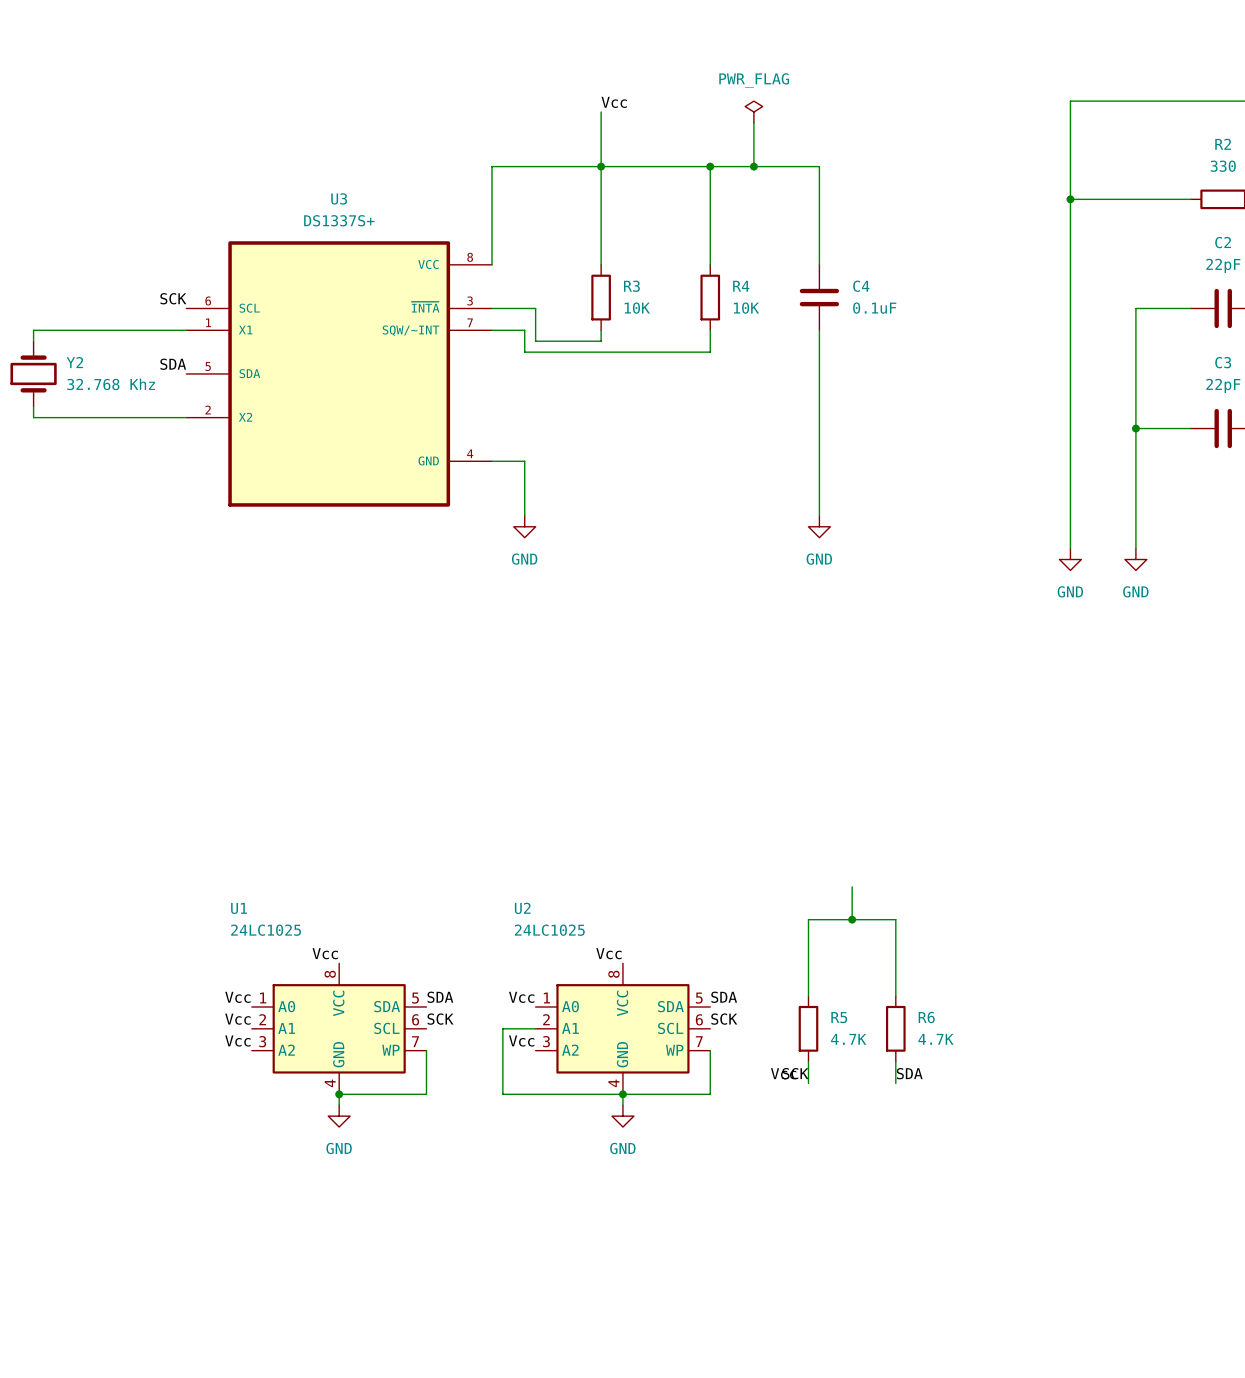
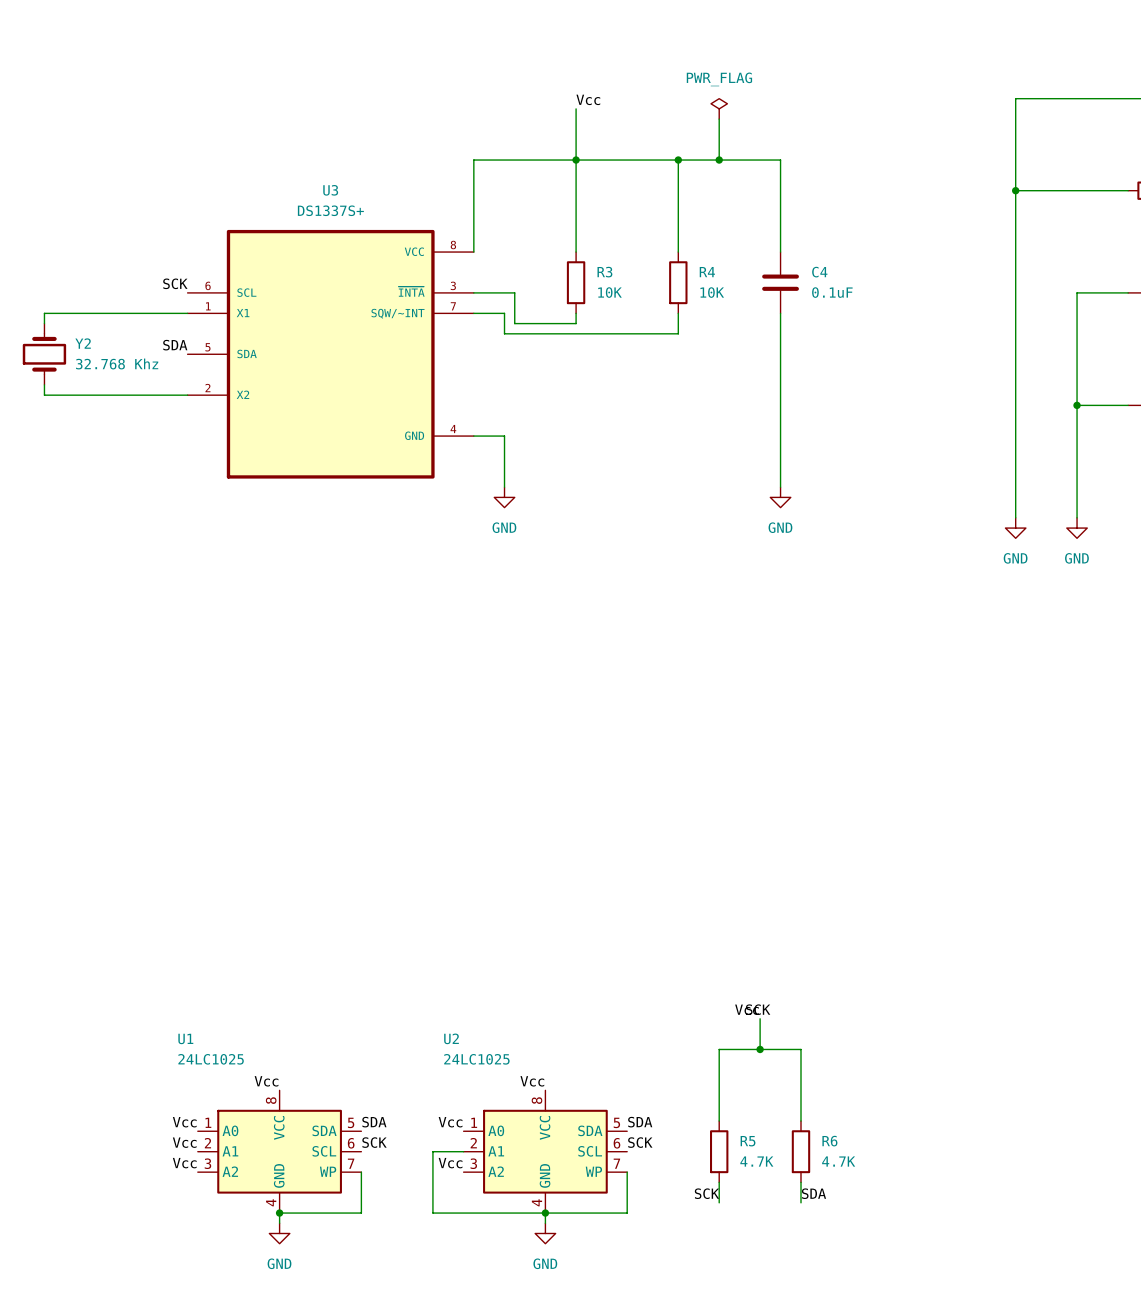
wire: (852, 886) (852, 919) -> (760, 1018) (760, 1049)
junction: (852, 919) -> none
label: Vcc (325, 953) -> none
label: Vcc (609, 953) -> none
wire: (808, 996) (808, 919) (895, 919) (895, 996) -> (719, 1121) (719, 1049) (800, 1049) (800, 1121)
label: Vcc (237, 997) -> none
label: SDA (440, 997) -> none
label: Vcc (521, 997) -> none
label: SDA (724, 997) -> none
label: Vcc (237, 1019) -> none
label: SCK (440, 1019) -> none
label: SCK (724, 1019) -> none
U1 position: (339, 1028) -> (279, 1151)
wire: (535, 1028) (502, 1028) (502, 1094) (710, 1094) (710, 1050) -> (463, 1151) (432, 1151) (432, 1213) (627, 1213) (627, 1172)
U2 position: (622, 1028) -> (545, 1151)
R5 position: (808, 1028) -> (719, 1151)
R6 position: (895, 1028) -> (800, 1151)
label: Vcc (237, 1041) -> none
label: Vcc (521, 1041) -> none
wire: (426, 1050) (426, 1094) (339, 1094) (339, 1105) -> (361, 1172) (361, 1213) (279, 1213) (279, 1223)
wire: (808, 1061) (808, 1083) -> (719, 1182) (719, 1202)
wire: (895, 1061) (895, 1083) -> (800, 1182) (800, 1202)
label: SDA (909, 1073) -> none
junction: (339, 1094) -> none
wire: (622, 1094) (622, 1105) -> (545, 1213) (545, 1223)
junction: (622, 1094) -> none
power symbol: GND (339, 1116) -> none
power symbol: GND (622, 1116) -> none
junction: none -> (760, 1049)
label: none -> Vcc (266, 1081)
label: none -> Vcc (532, 1081)
label: none -> Vcc (184, 1122)
label: none -> SDA (374, 1122)
label: none -> Vcc (450, 1122)
label: none -> SDA (640, 1122)
label: none -> Vcc (184, 1142)
label: none -> SCK (374, 1142)
label: none -> SCK (640, 1142)
label: none -> Vcc (184, 1163)
label: none -> Vcc (450, 1163)
label: none -> SCK (706, 1193)
label: none -> SDA (814, 1193)
junction: none -> (279, 1213)
junction: none -> (545, 1213)
power symbol: none -> GND (279, 1233)
power symbol: none -> GND (545, 1233)

